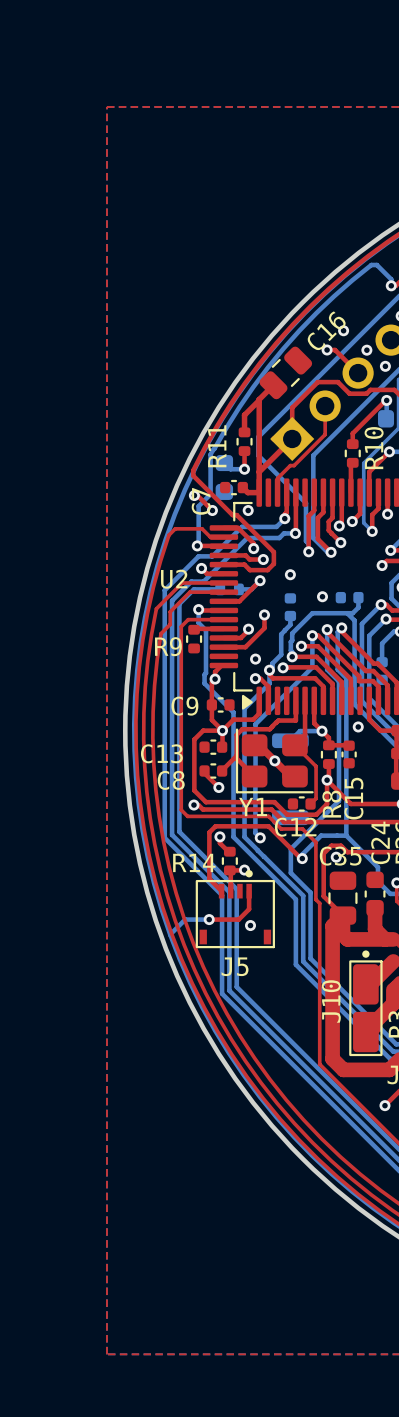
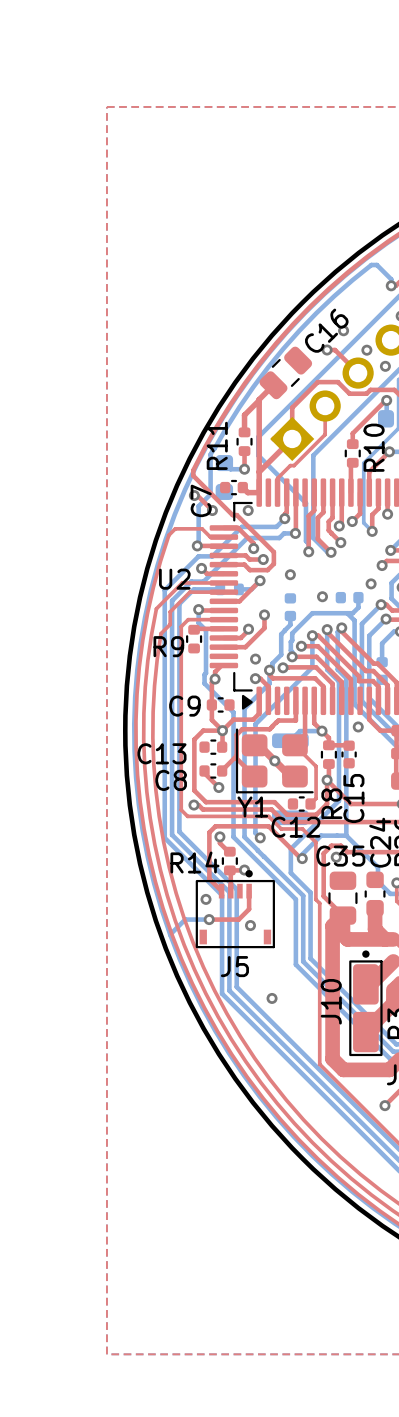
via: none -> (371, 583)
via: none -> (206, 899)
via: none -> (272, 998)

